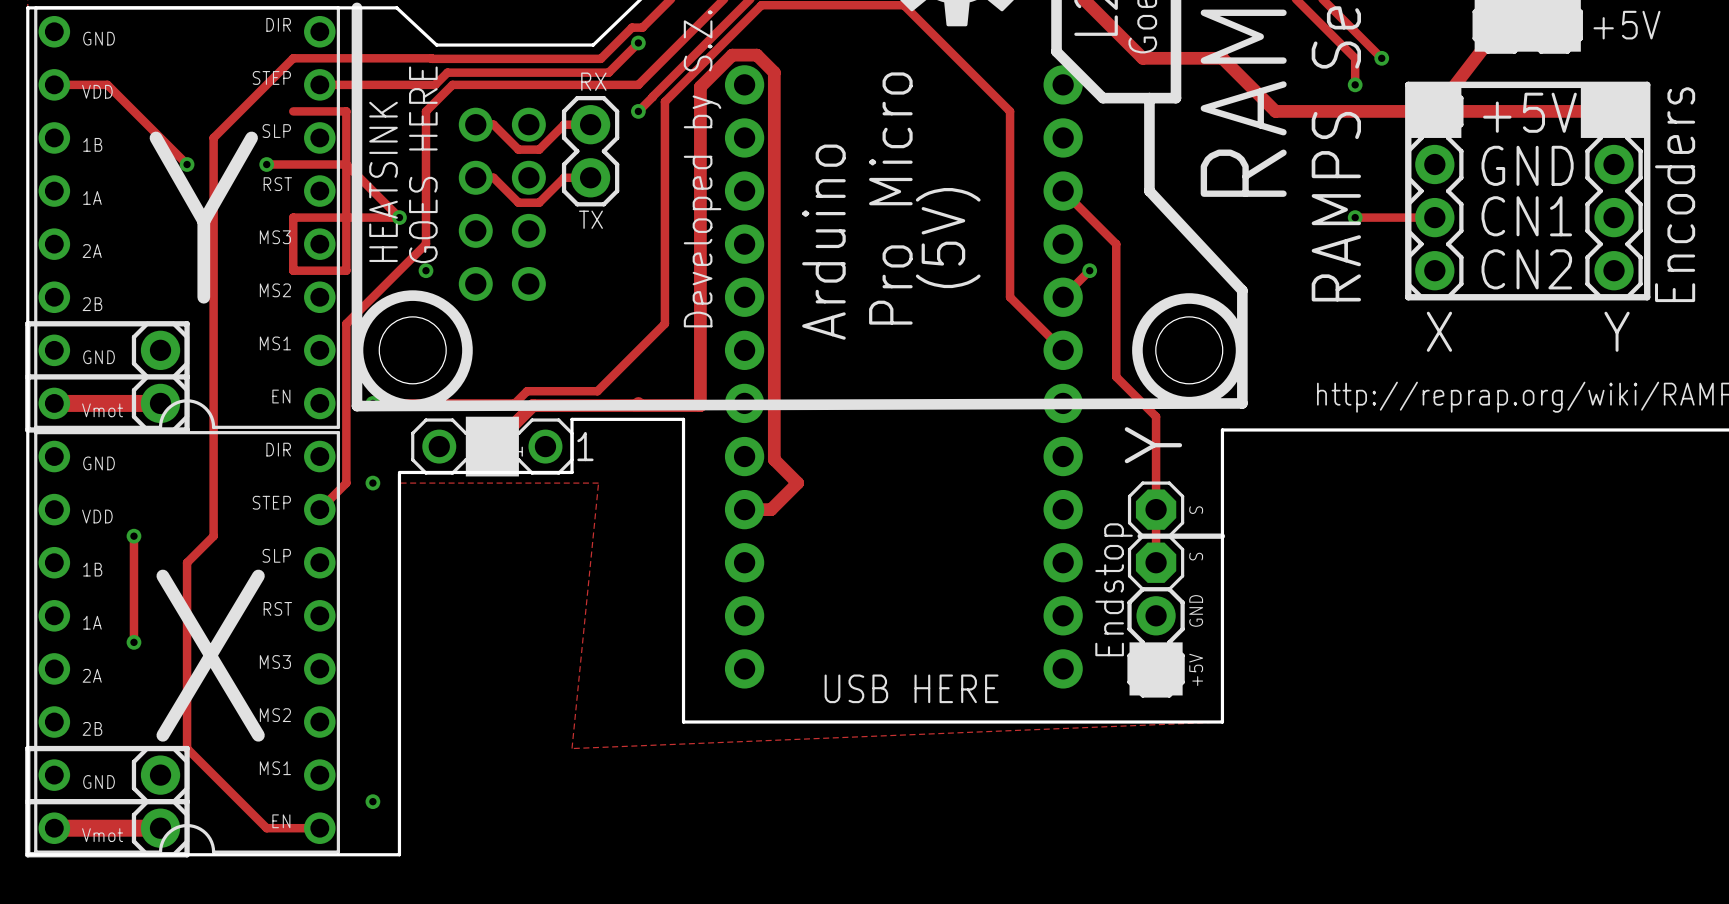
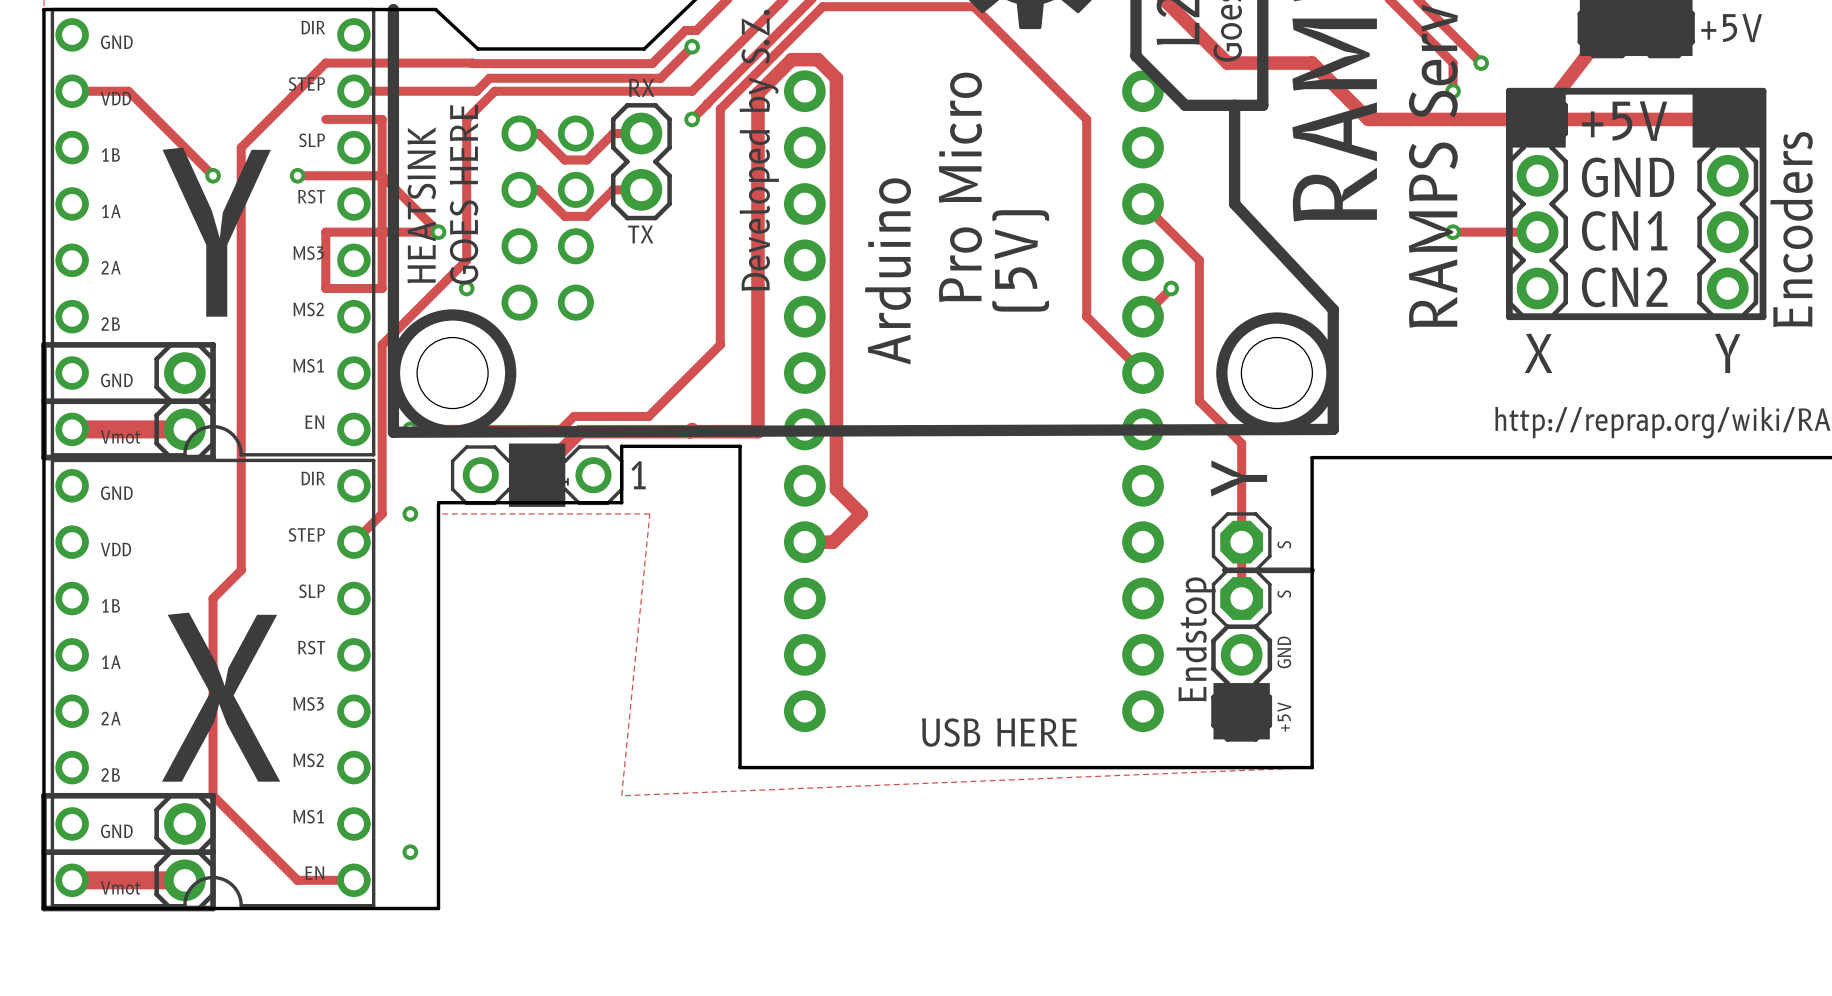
track: (133, 536) (133, 642) -> none
via: (133, 536) -> none
via: (133, 642) -> none

